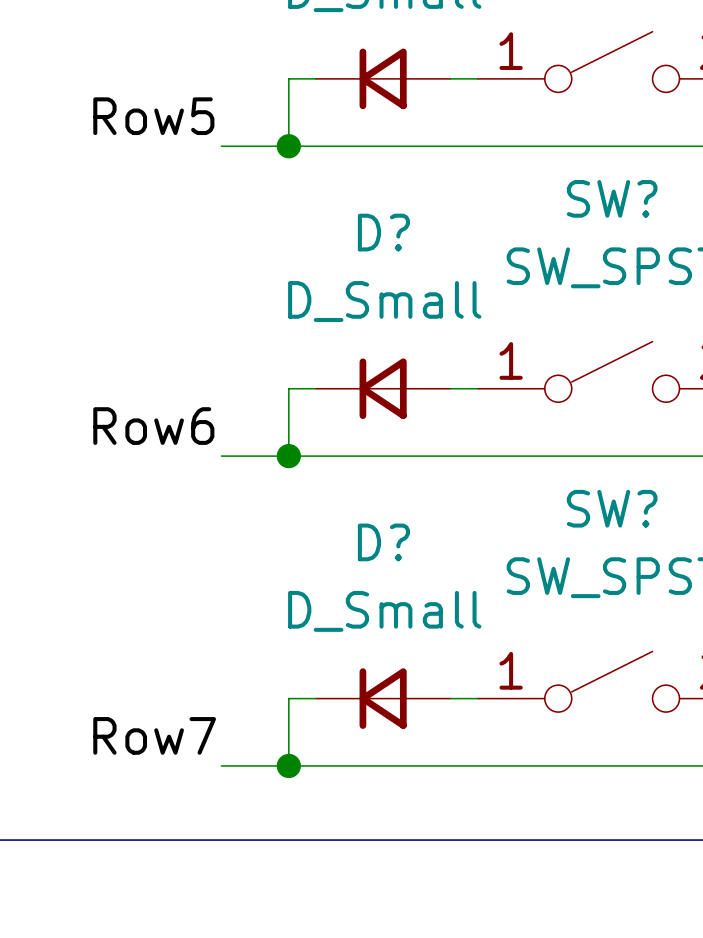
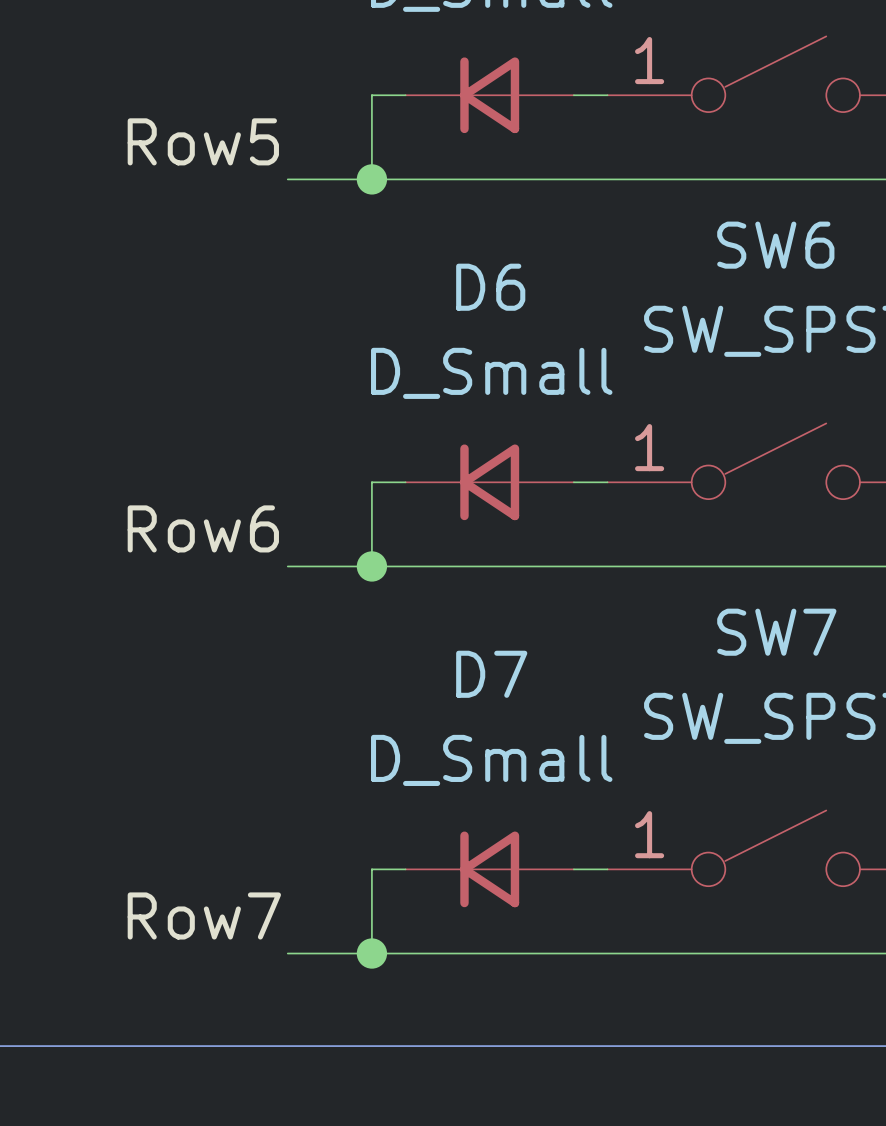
SW? name: SW? (612, 198) -> SW6 (775, 245)
D? name: D? (383, 232) -> D6 (490, 287)
SW? name: SW? (612, 508) -> SW7 (776, 632)
D? name: D? (383, 542) -> D7 (491, 674)

